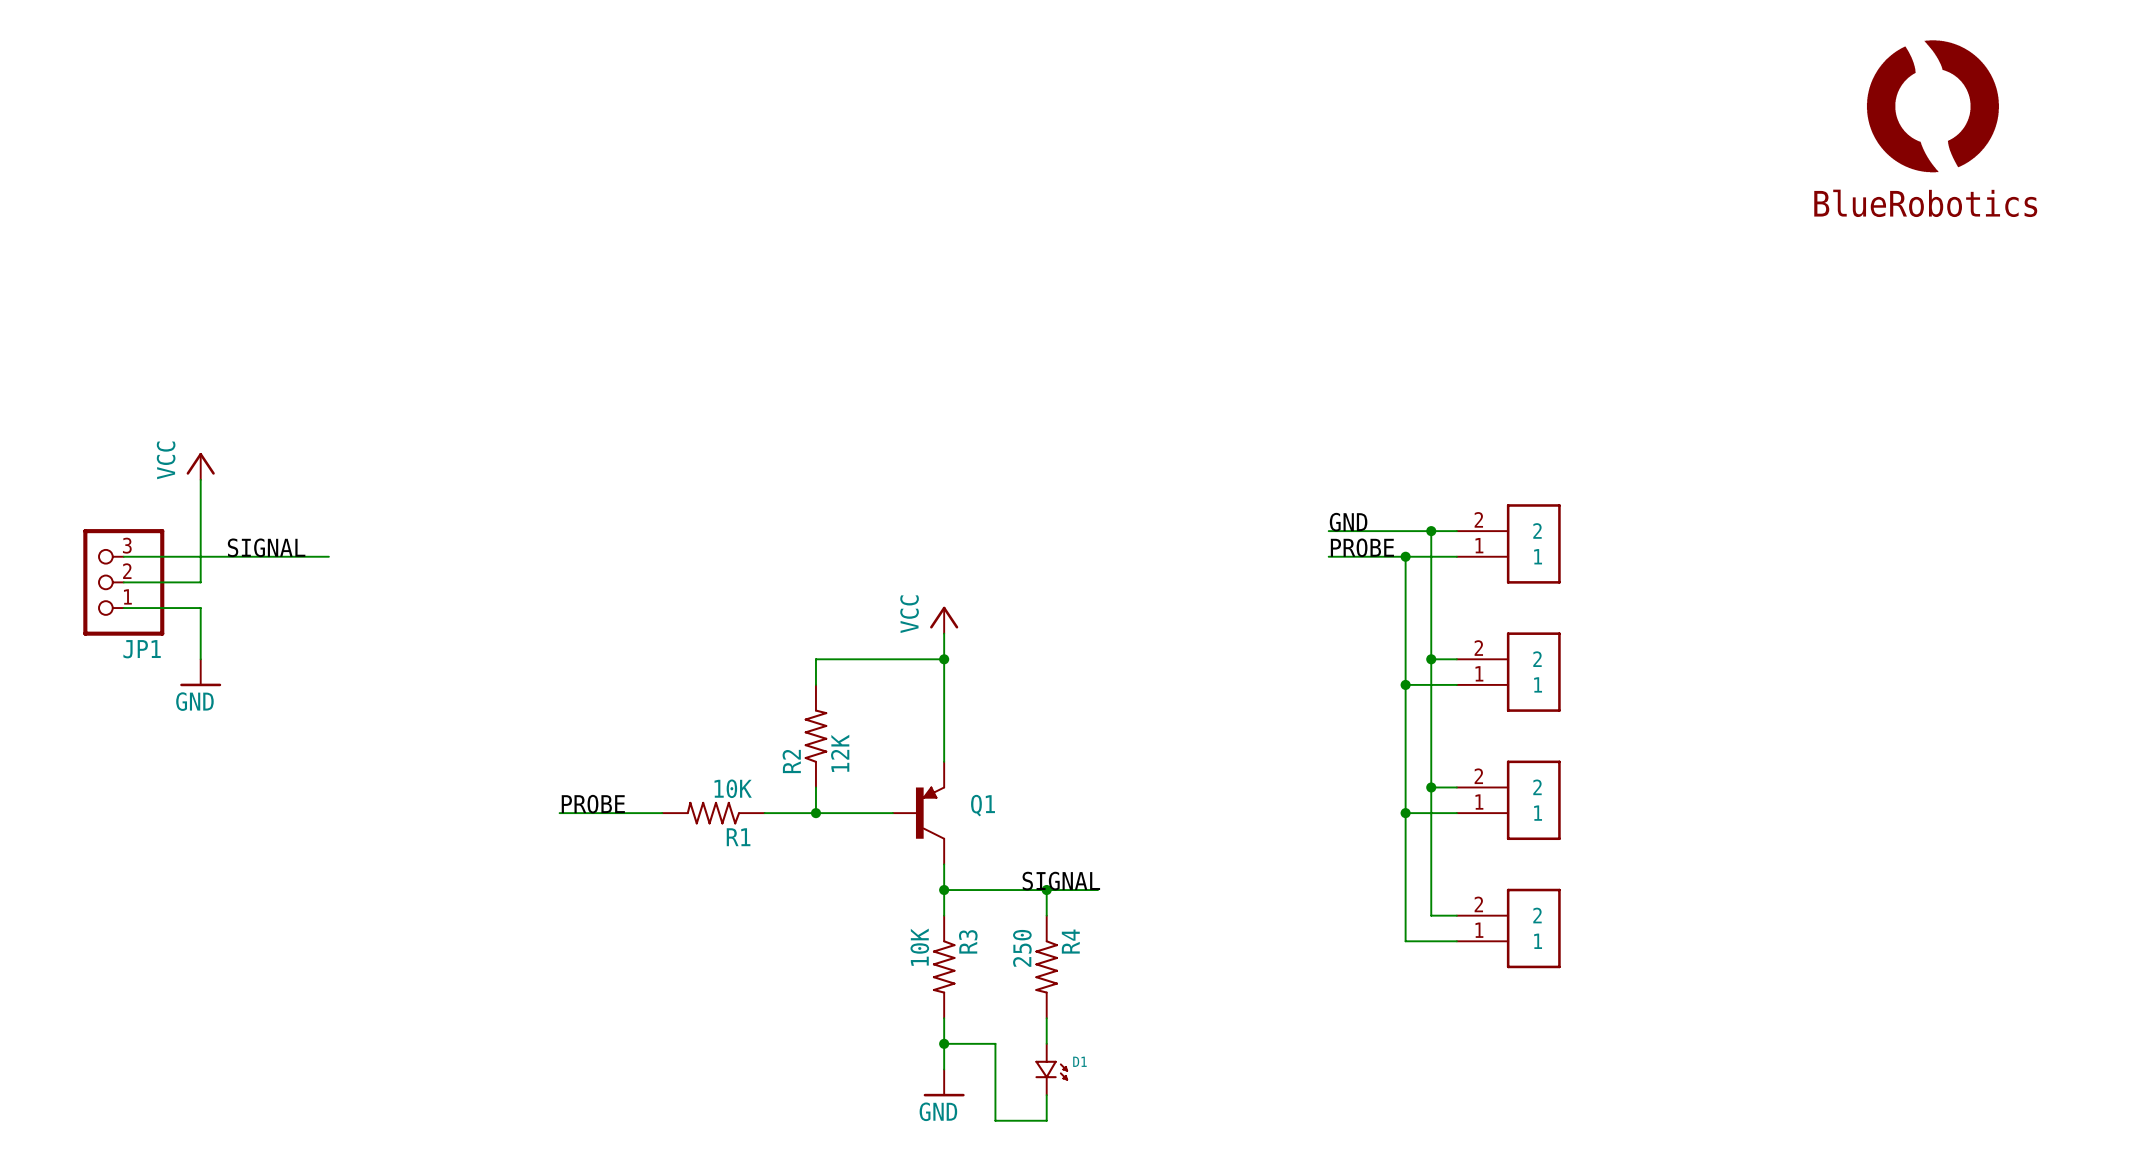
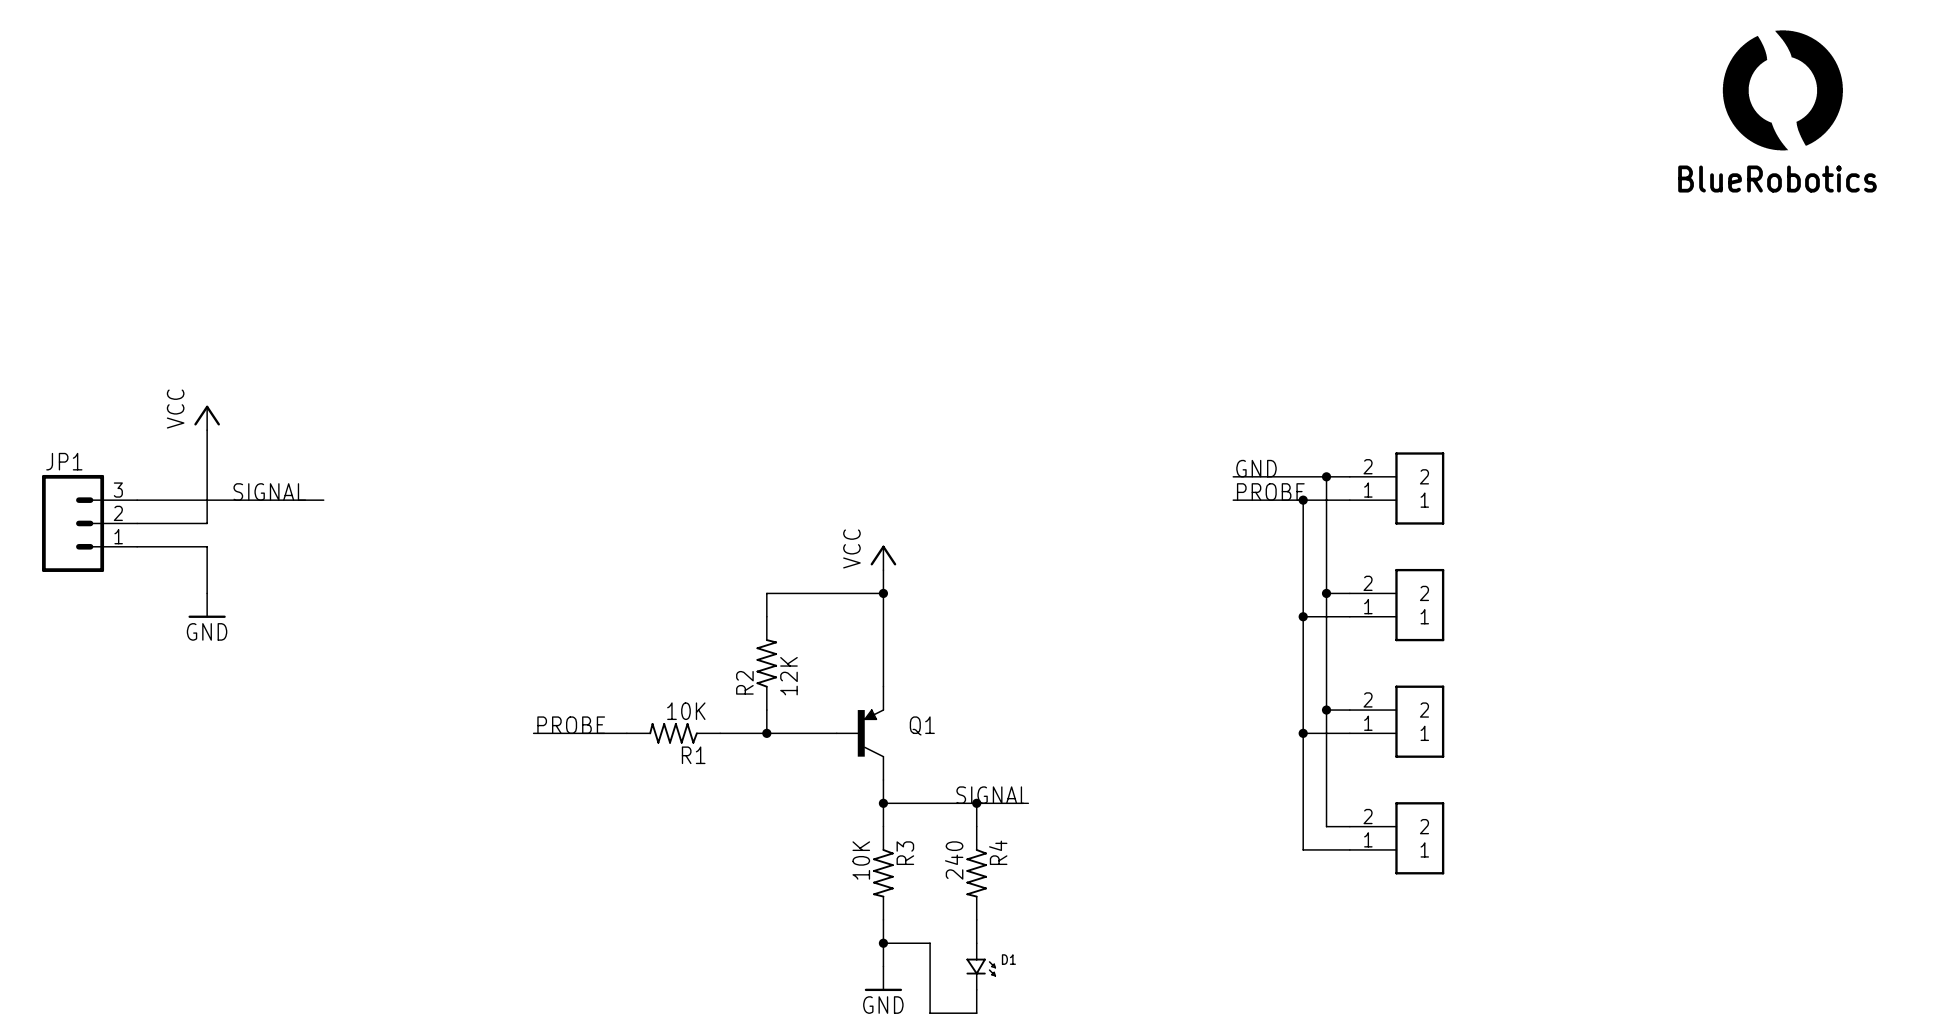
JP1 symbol: [83, 529, 165, 636] -> [42, 474, 138, 572]
JP1 name position: JP1 (142, 649) -> JP1 (64, 461)
R4 value: 250 (1022, 948) -> 240 (954, 860)

